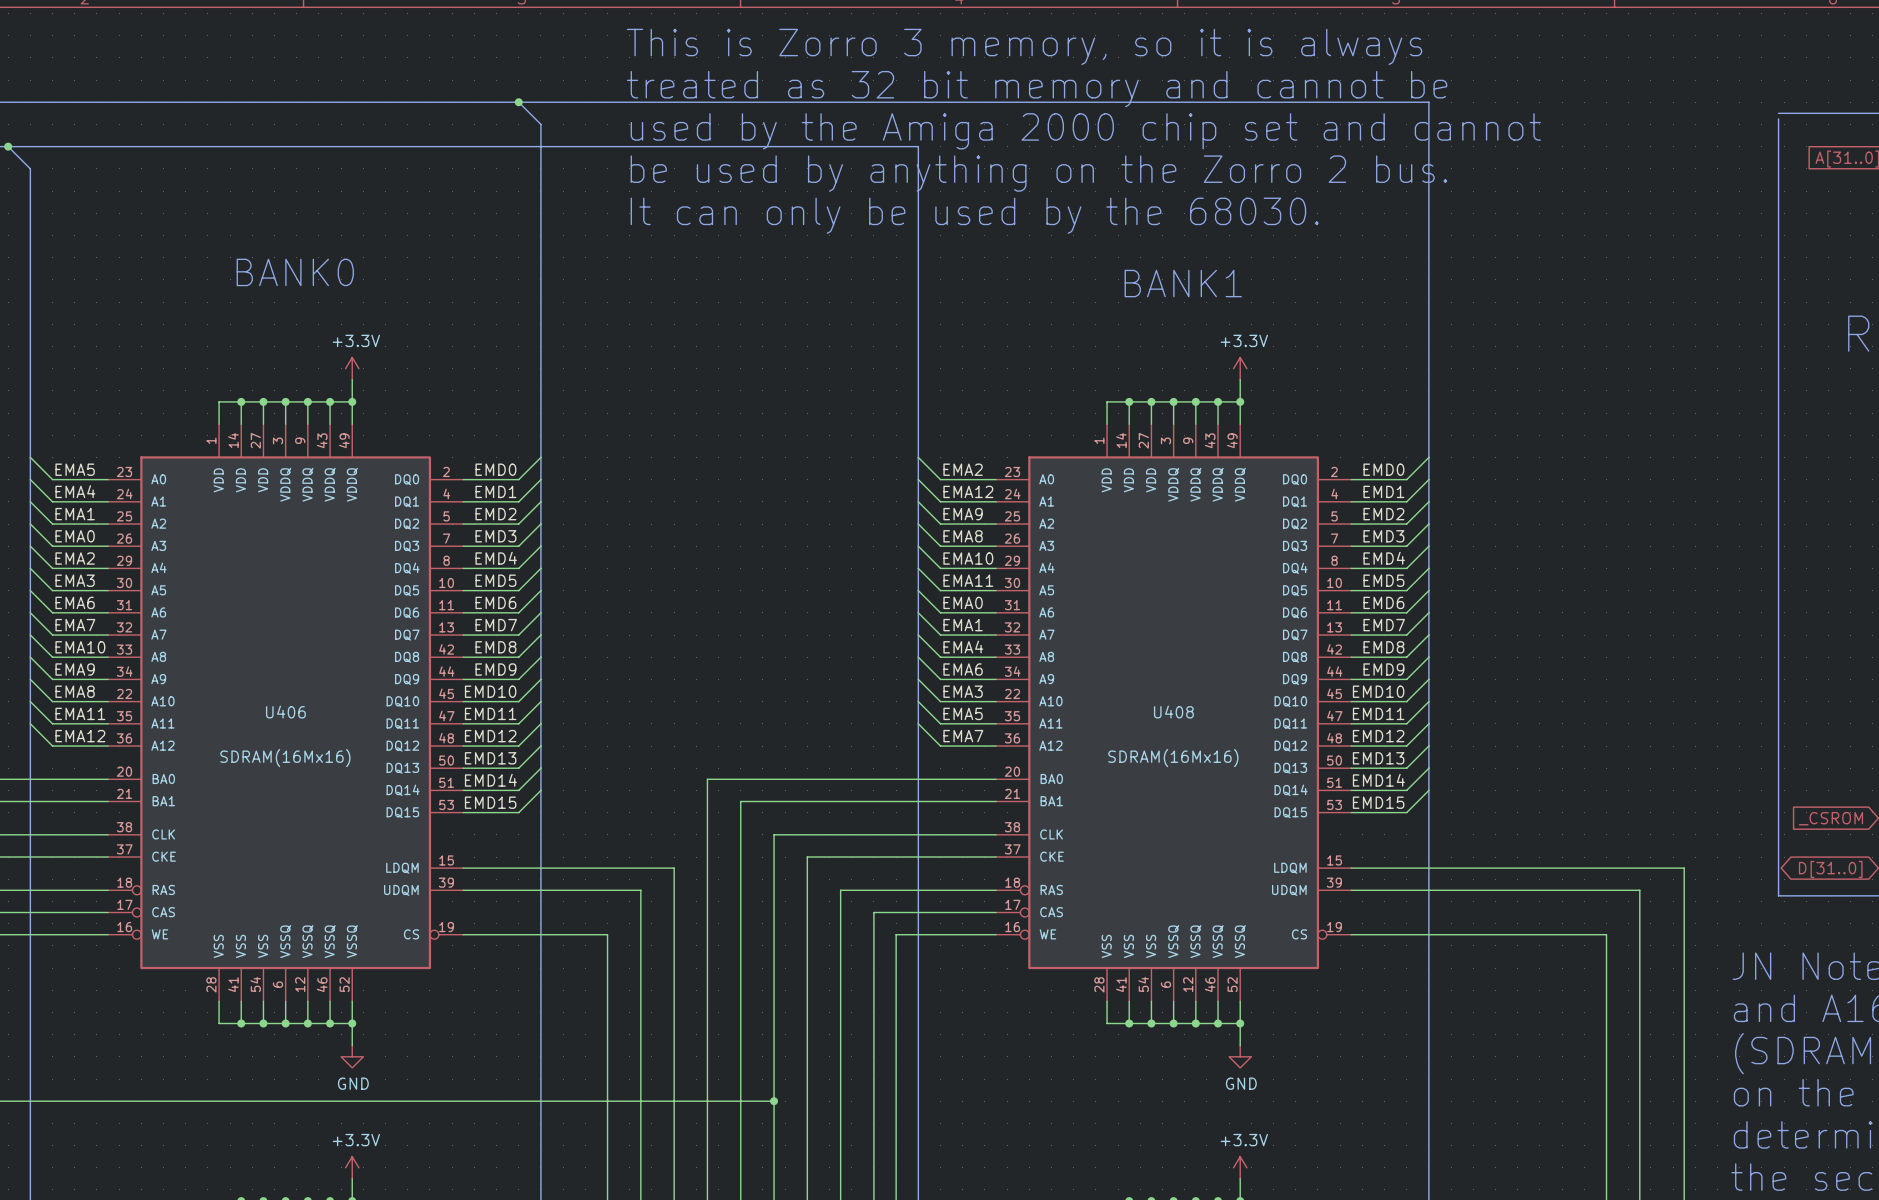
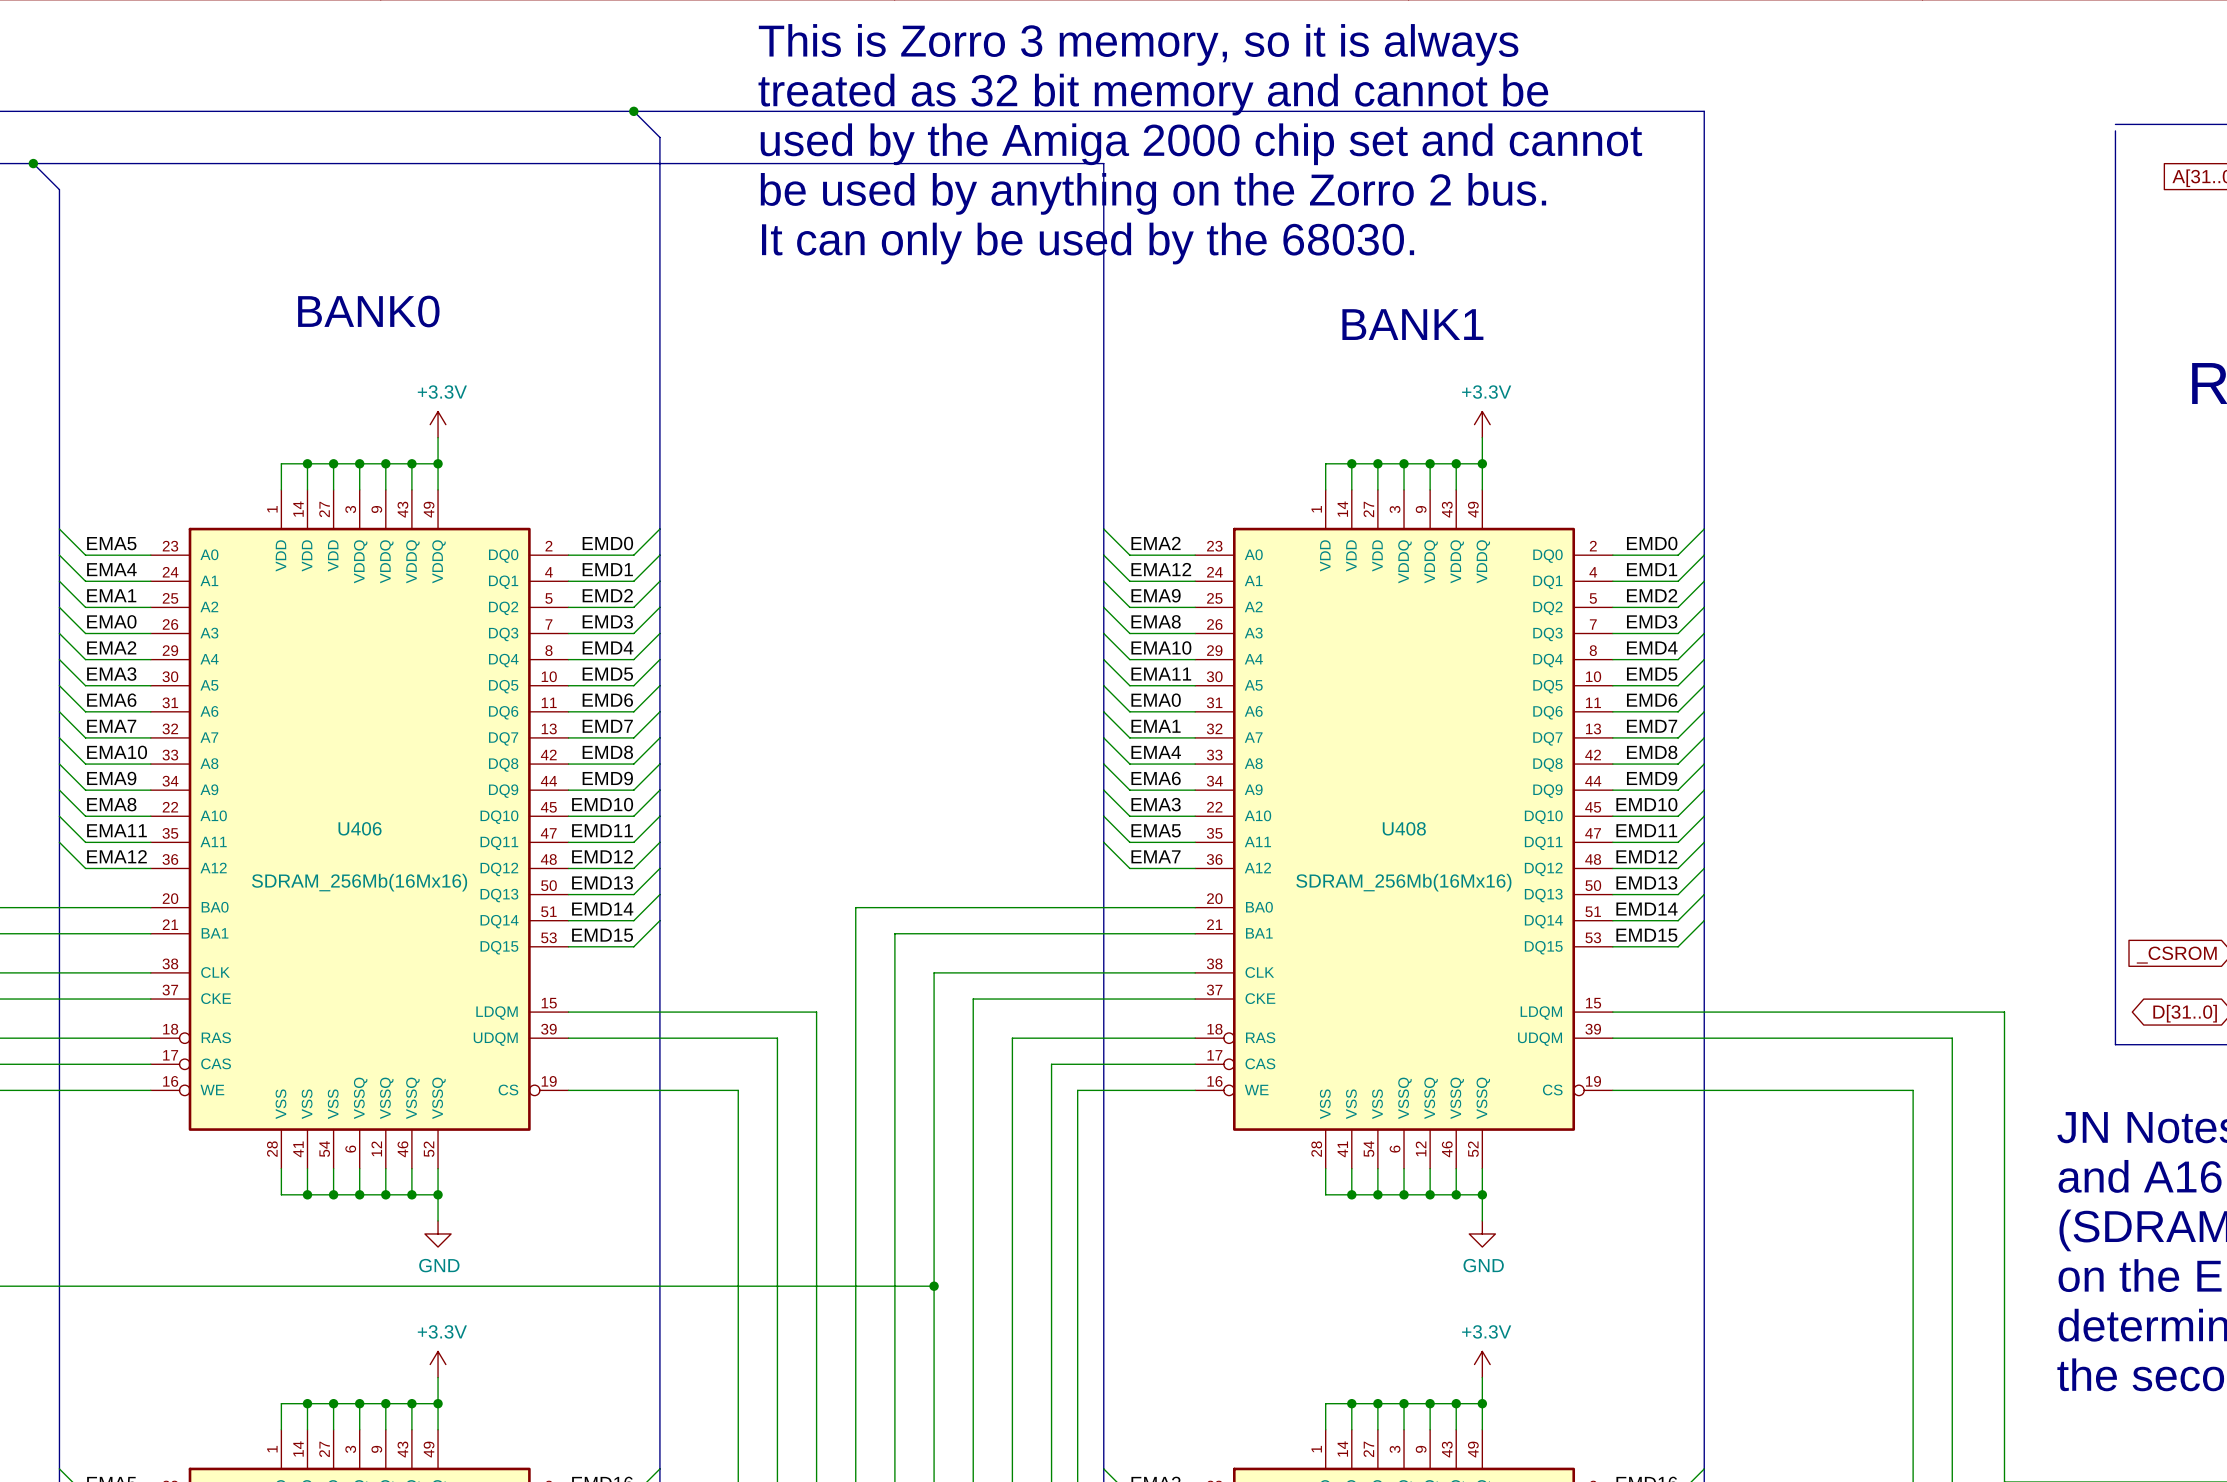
U406 value: SDRAM(16Mx16) (285, 758) -> SDRAM_256Mb(16Mx16) (359, 882)
U408 value: SDRAM(16Mx16) (1173, 758) -> SDRAM_256Mb(16Mx16) (1403, 882)

